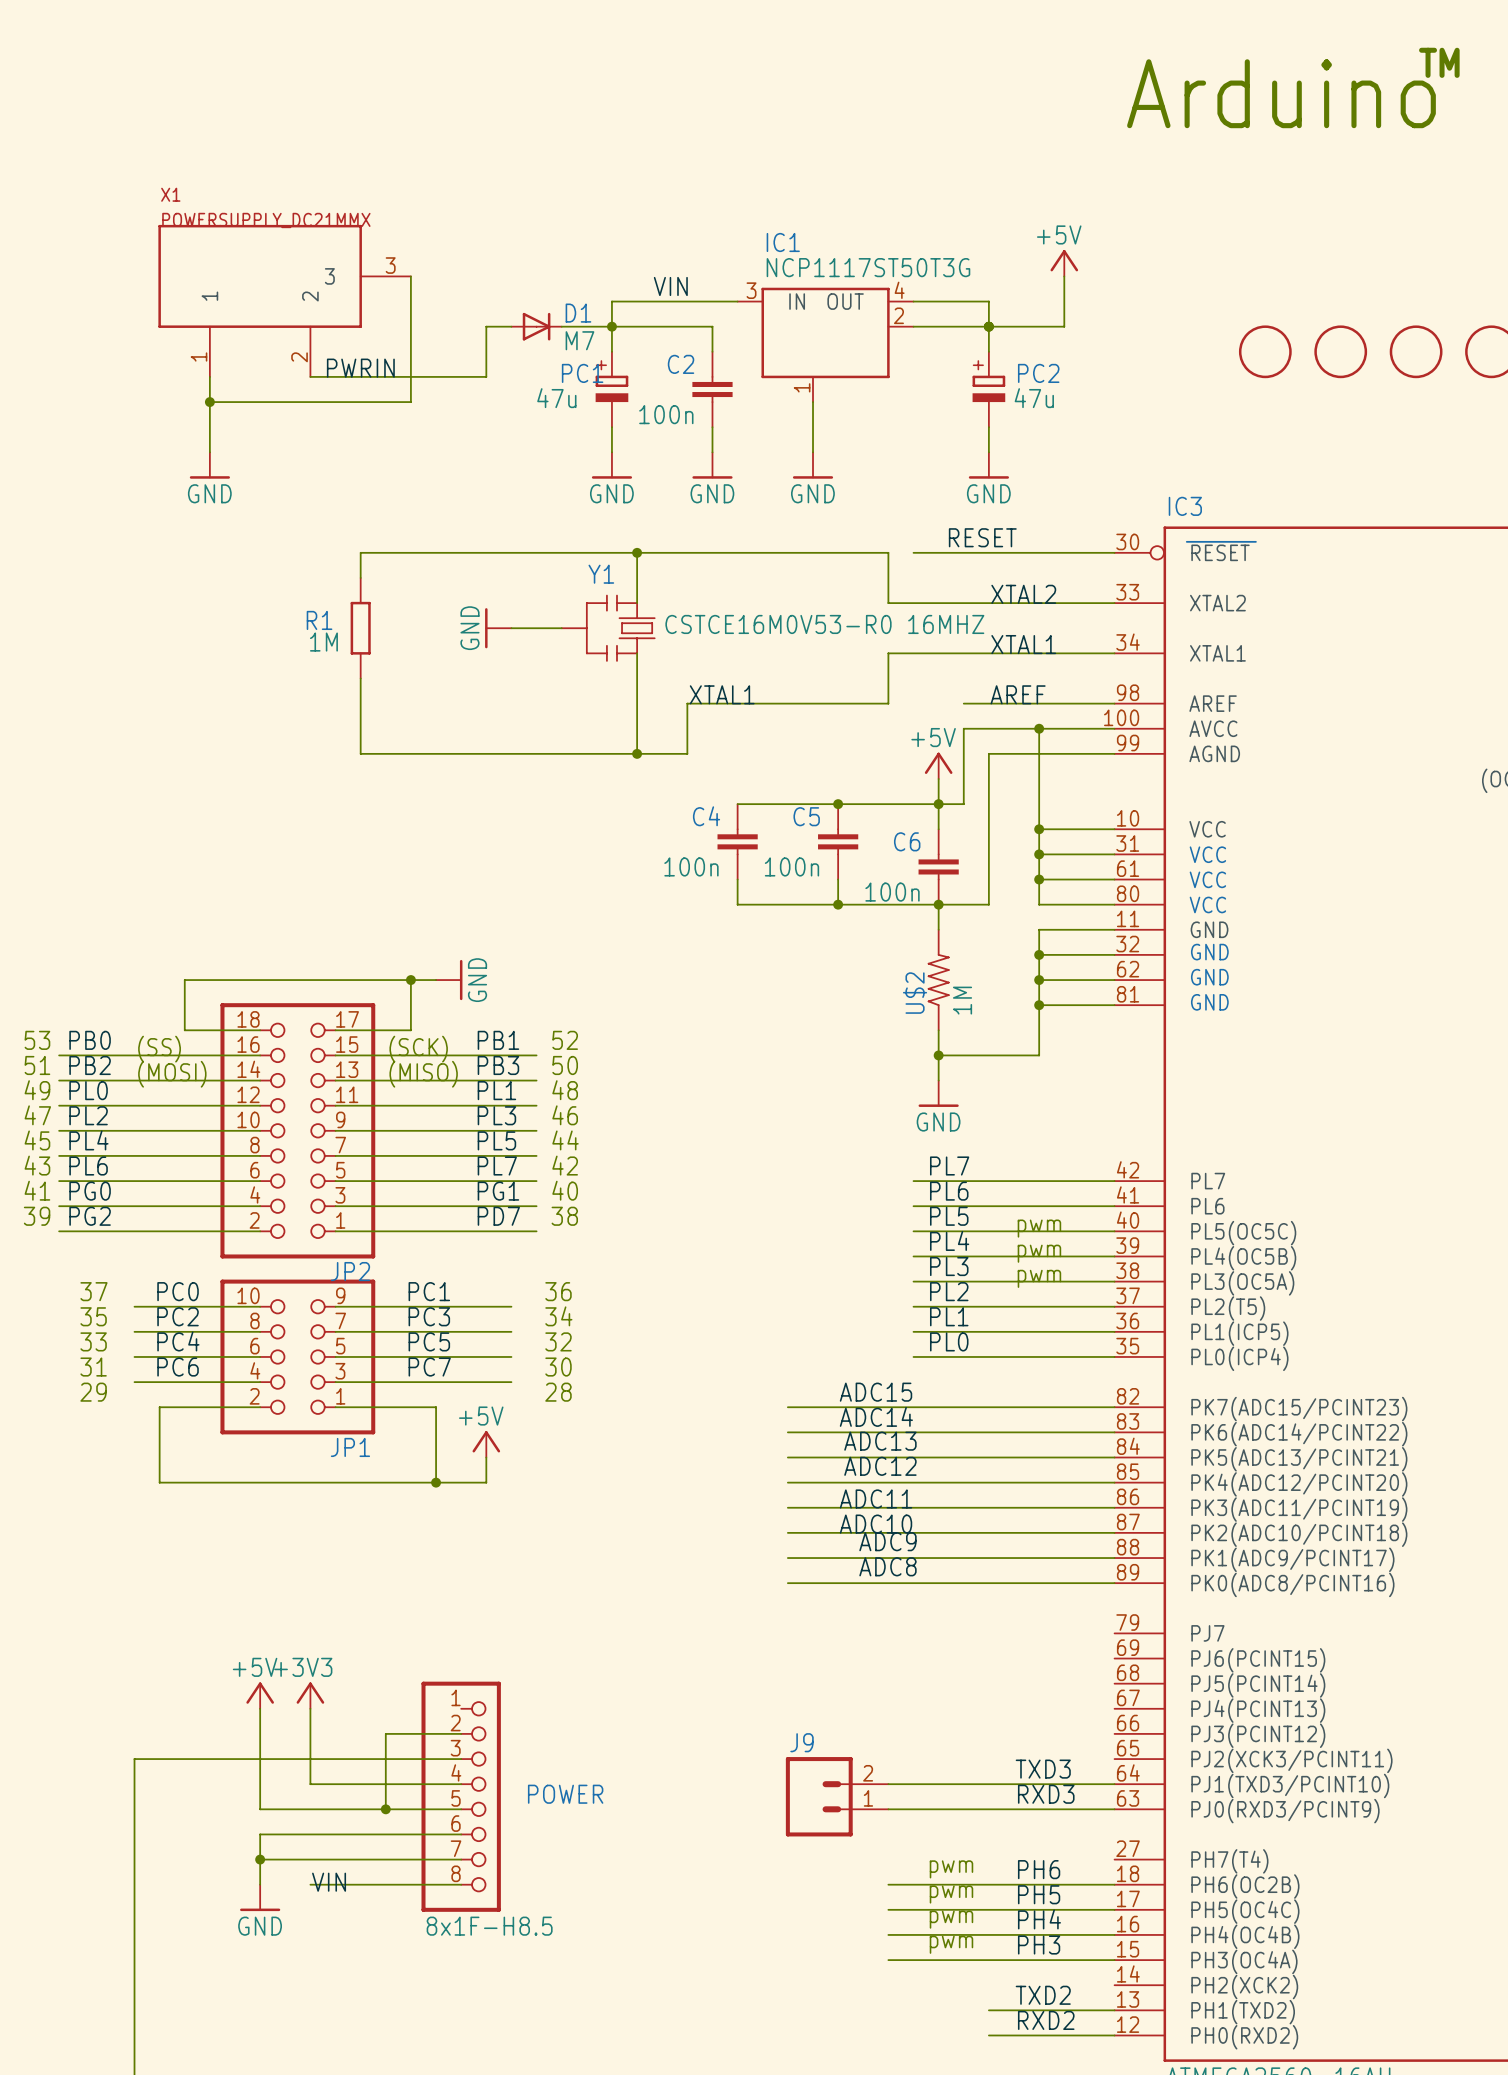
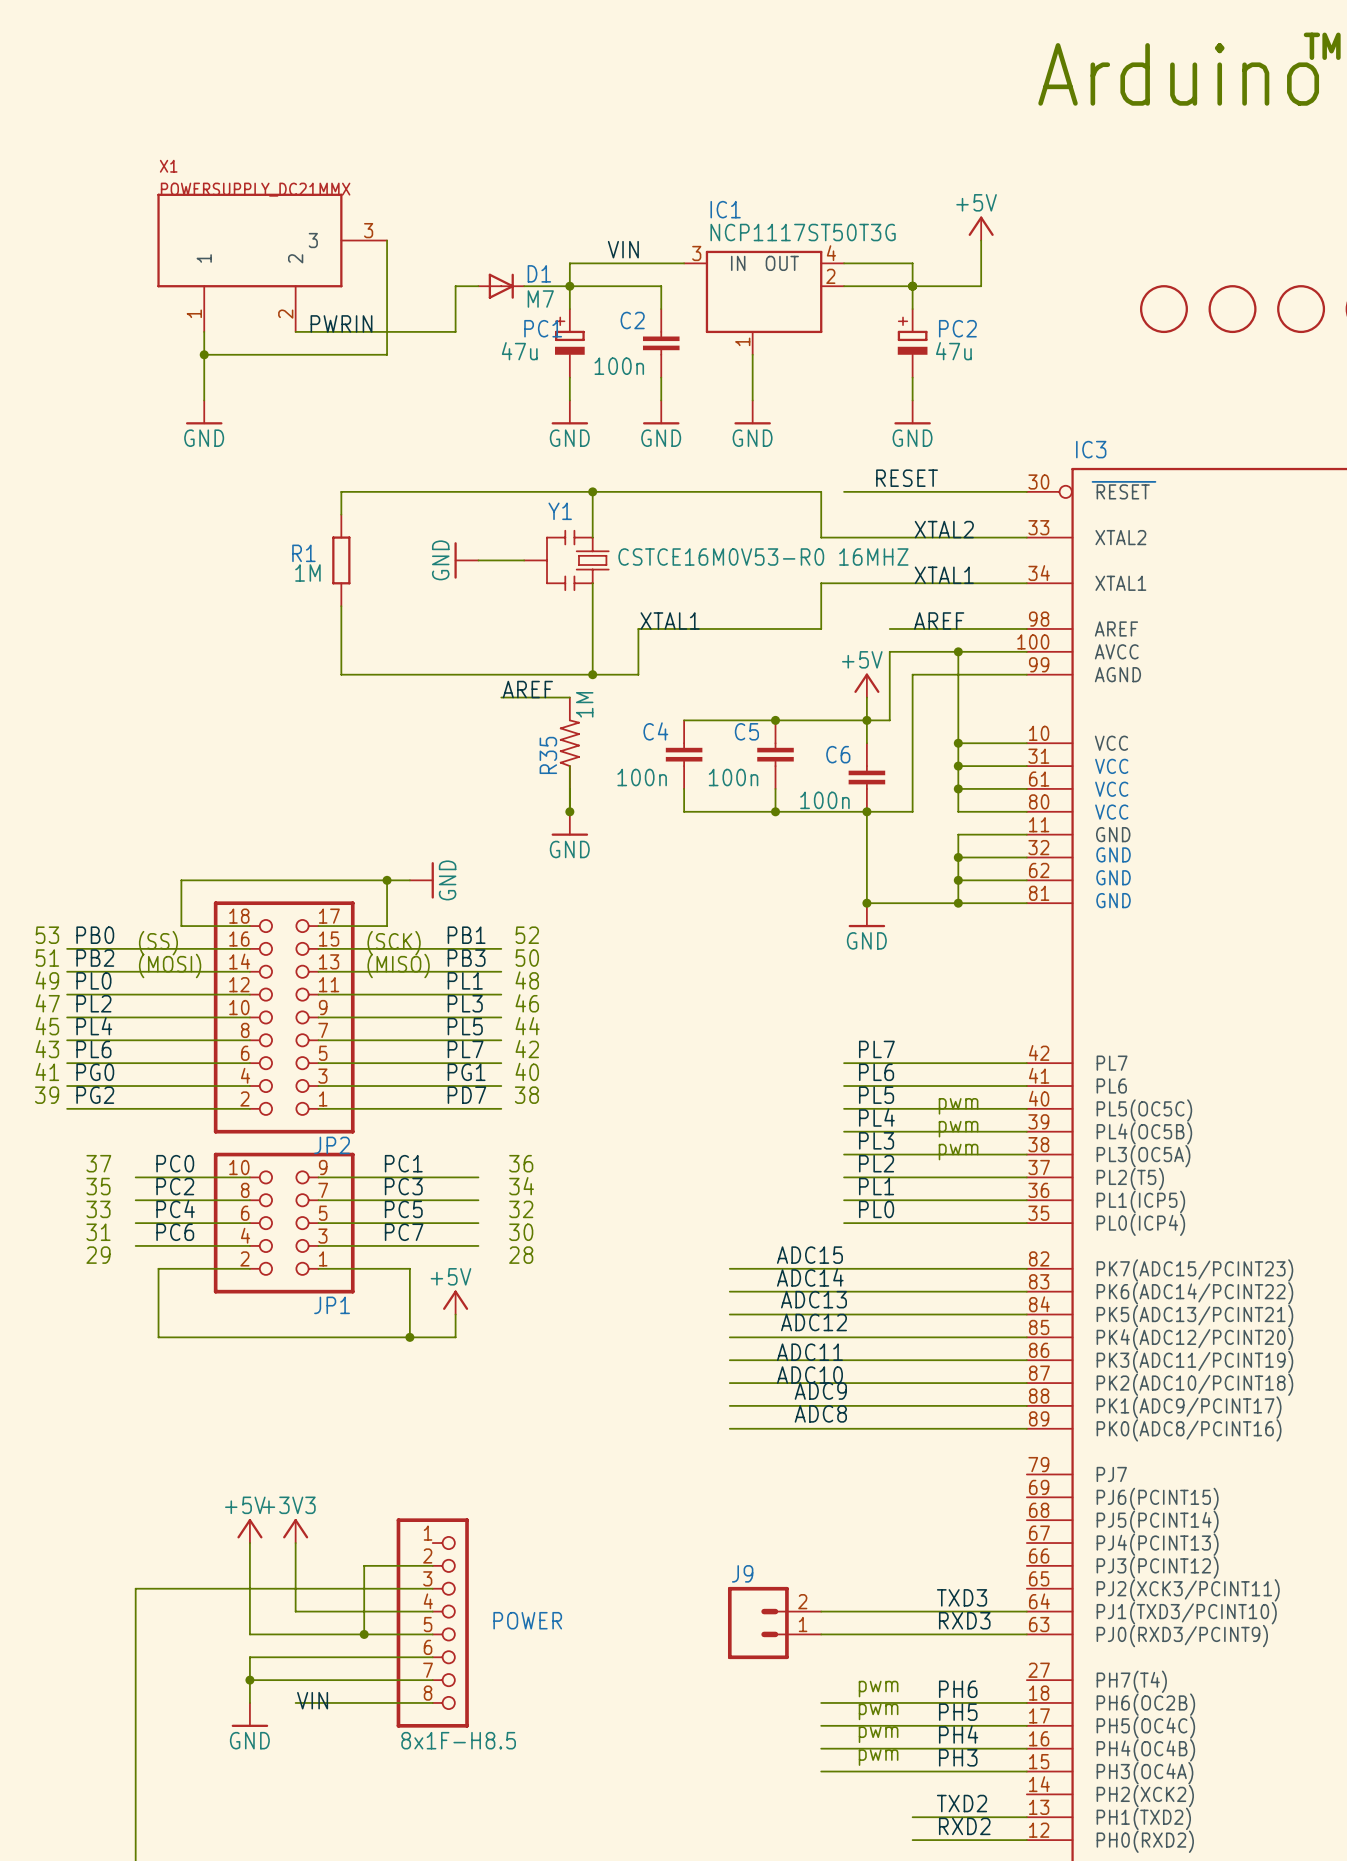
label: none -> AREF (527, 689)
wire: none -> (501, 697) (569, 697)
R35: none -> (569, 743)
wire: none -> (569, 766) (569, 811)
junction: none -> (569, 811)
power symbol: none -> GND (569, 823)
U$2: 1M (938, 980) -> none
wire: (1039, 1005) (1039, 1055) (938, 1055) -> (958, 903) (866, 903) (866, 834)
wire: (938, 1030) (938, 1080) -> none
junction position: (938, 1055) -> (866, 903)
power symbol position: GND (938, 1093) -> GND (866, 915)

